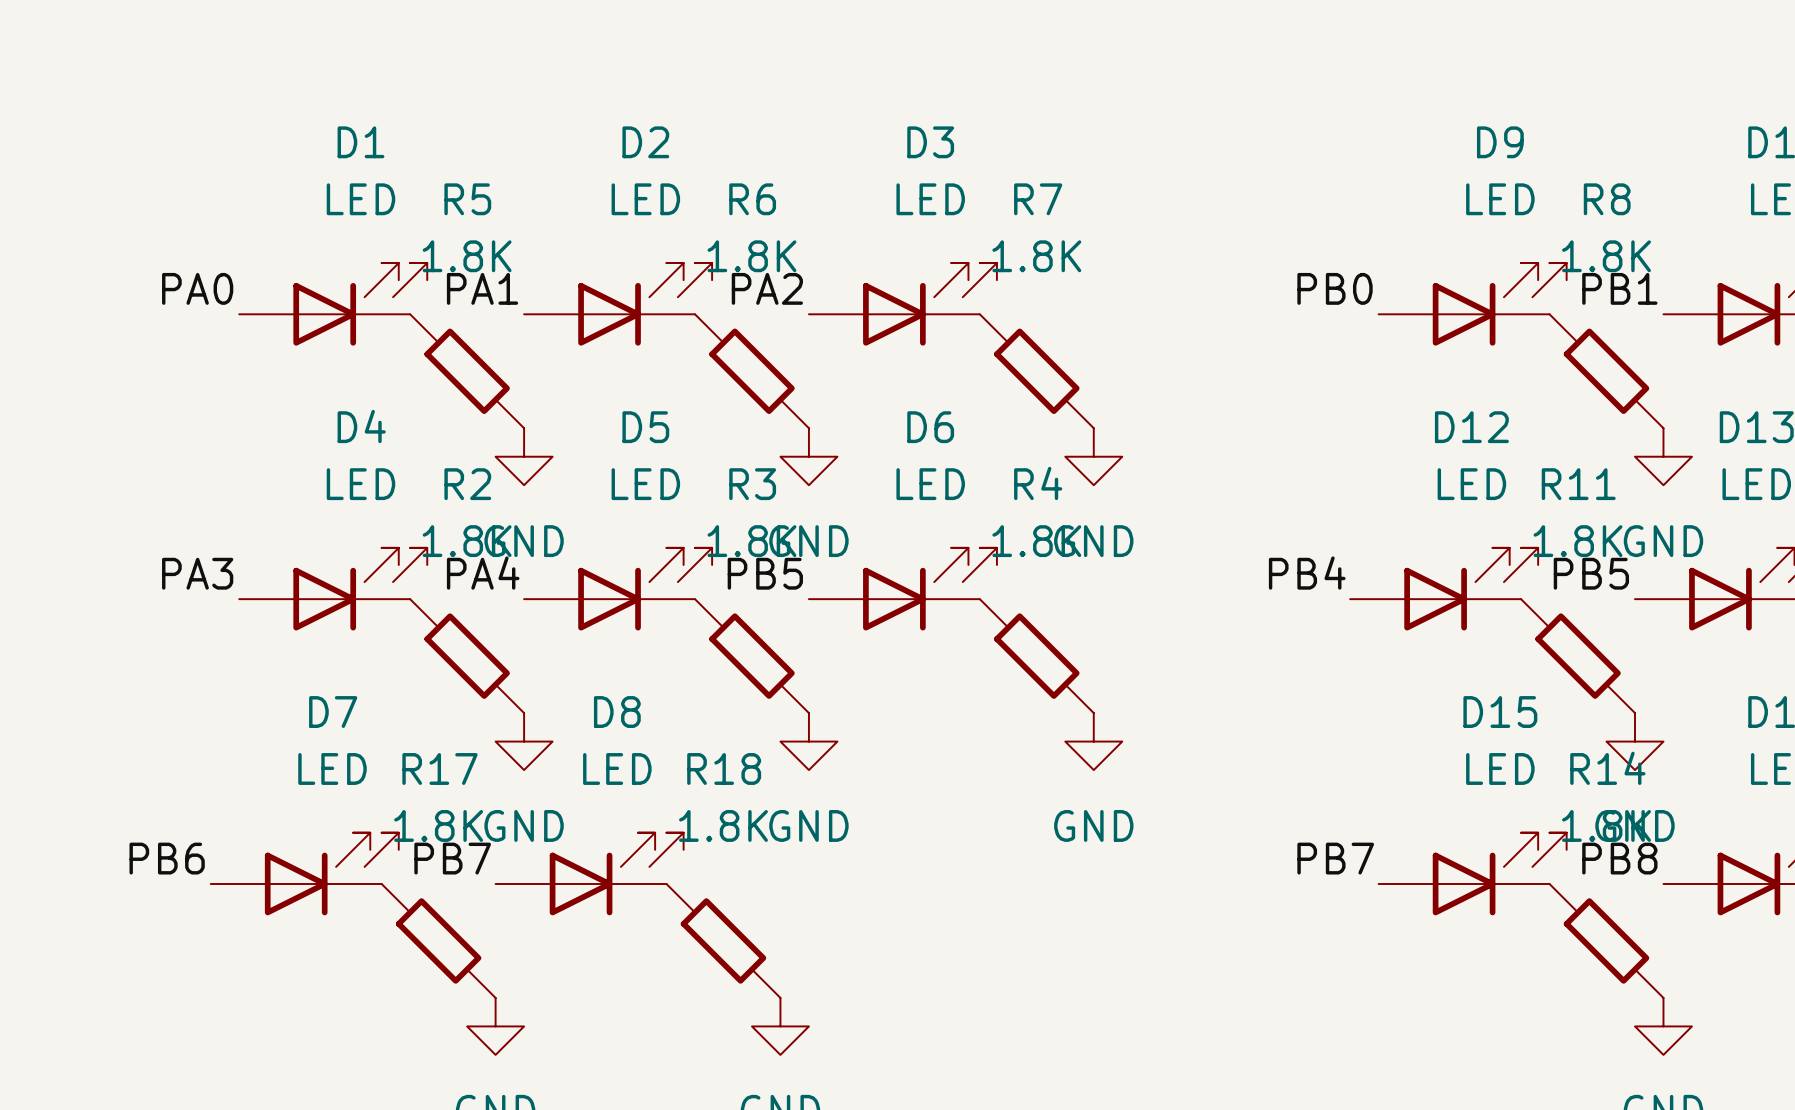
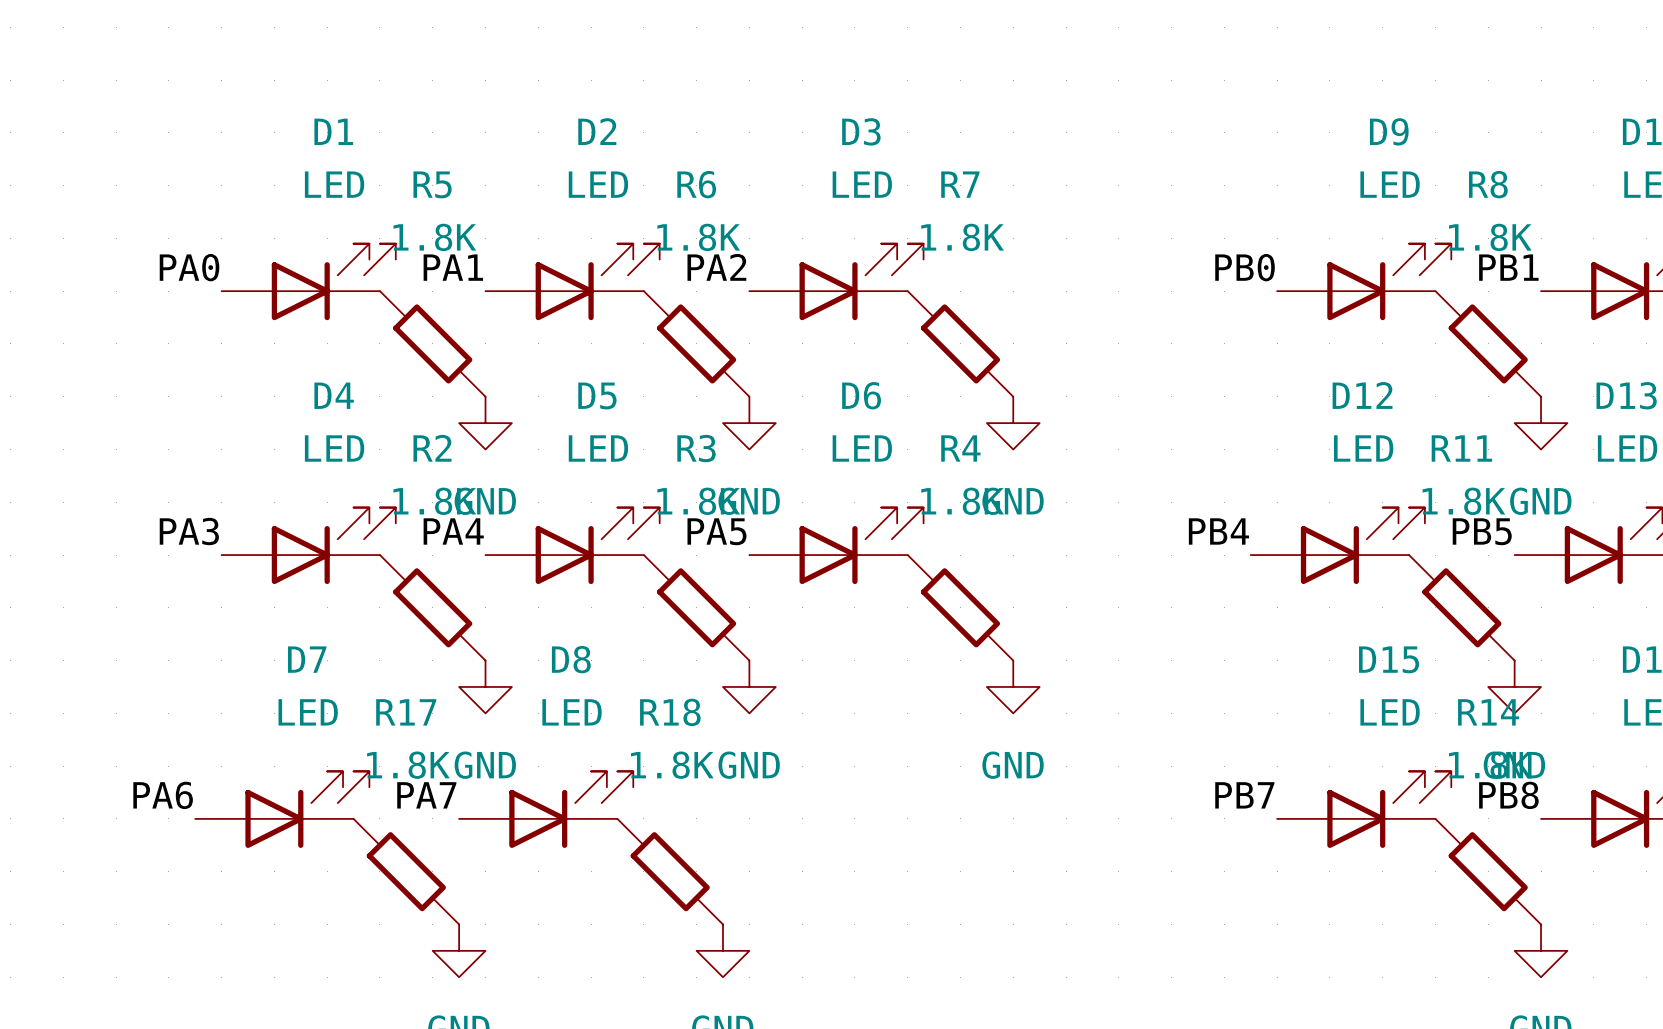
label: PB5 (765, 573) -> PA5 (716, 531)
label: PB6 (167, 858) -> PA6 (163, 795)
label: PB7 (452, 858) -> PA7 (426, 795)

